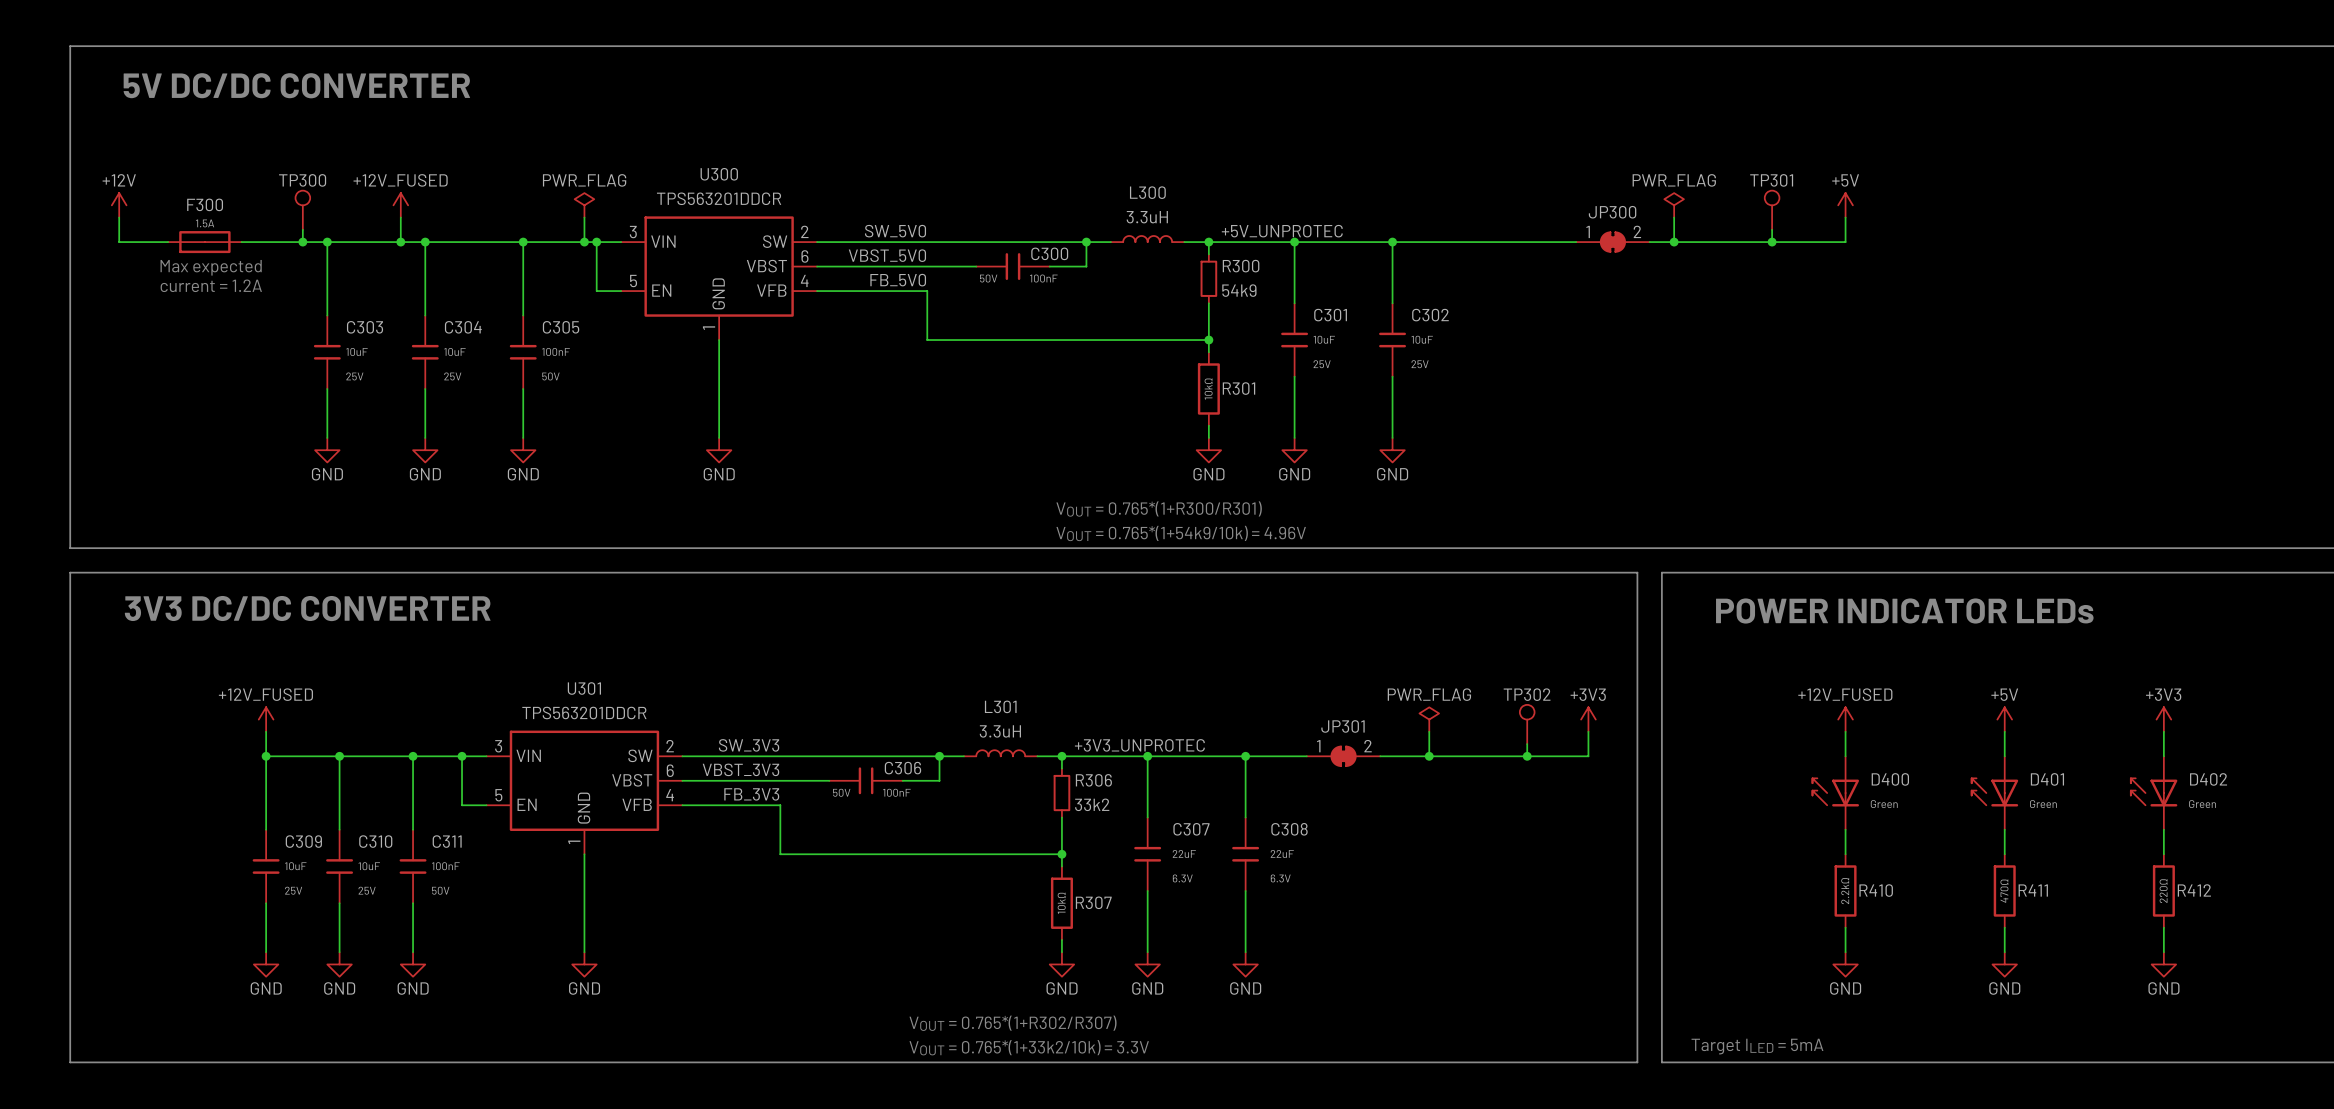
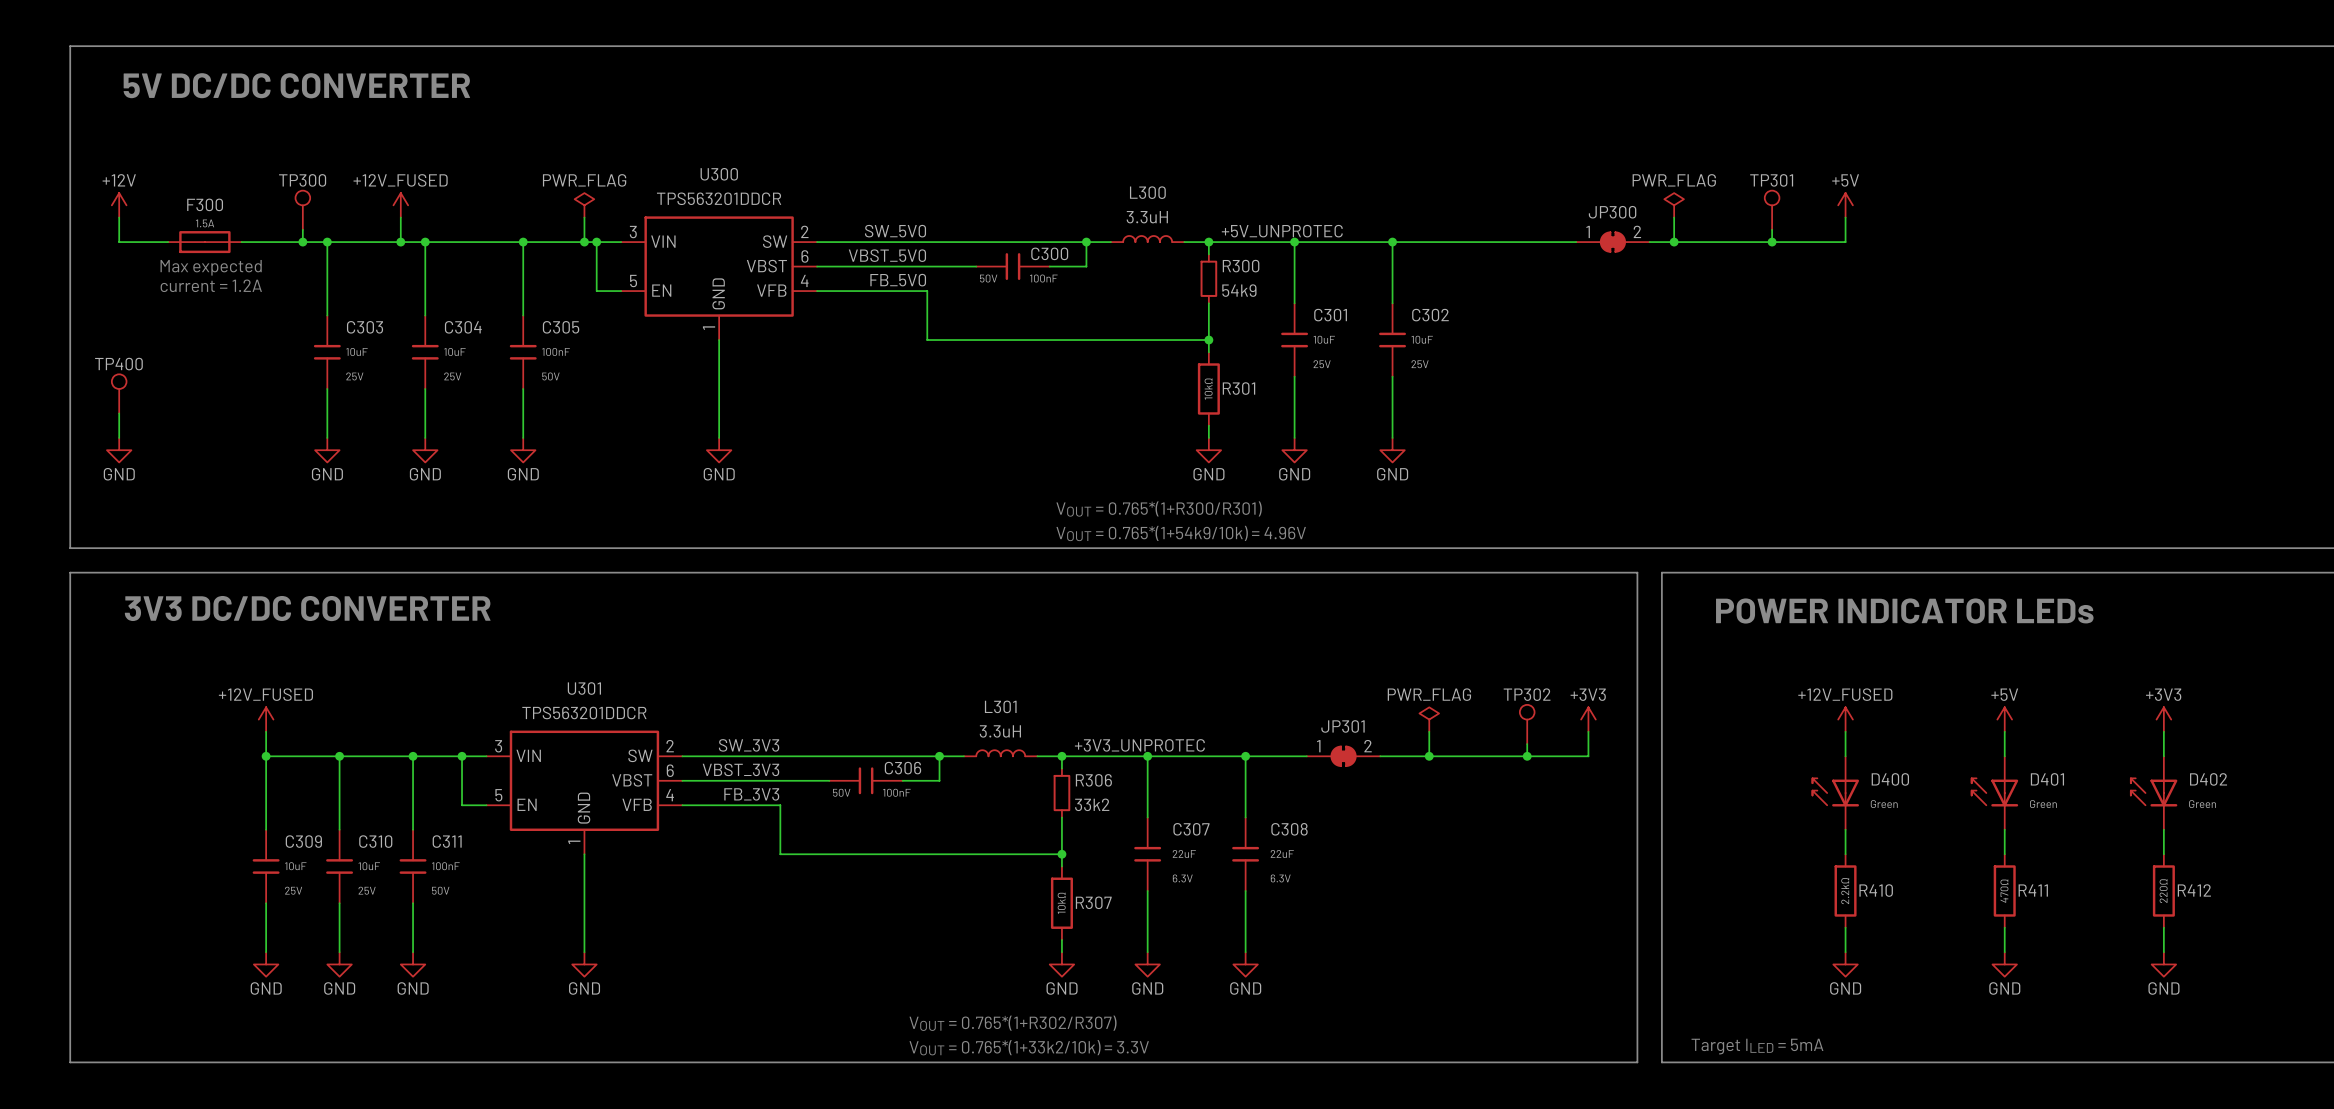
TP400: none -> (119, 393)
wire: none -> (119, 413) (119, 437)
power symbol: none -> GND (119, 450)

